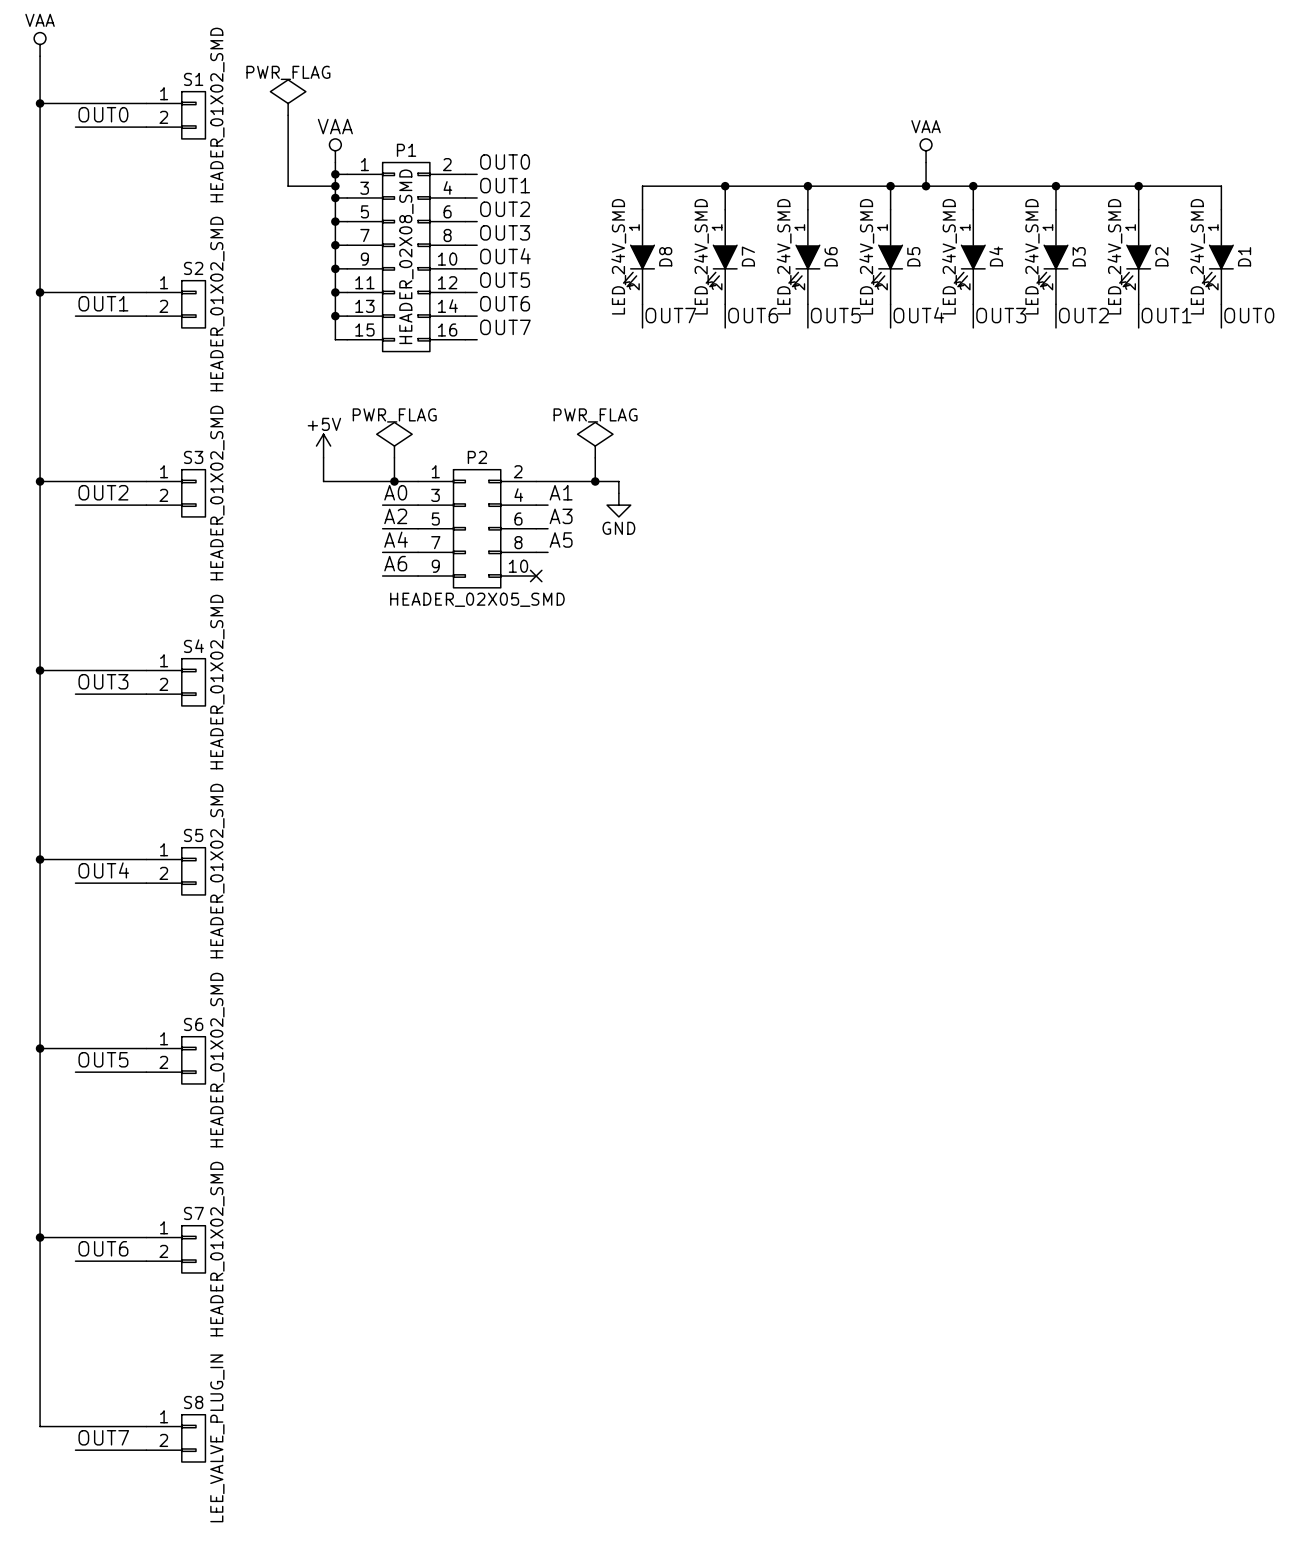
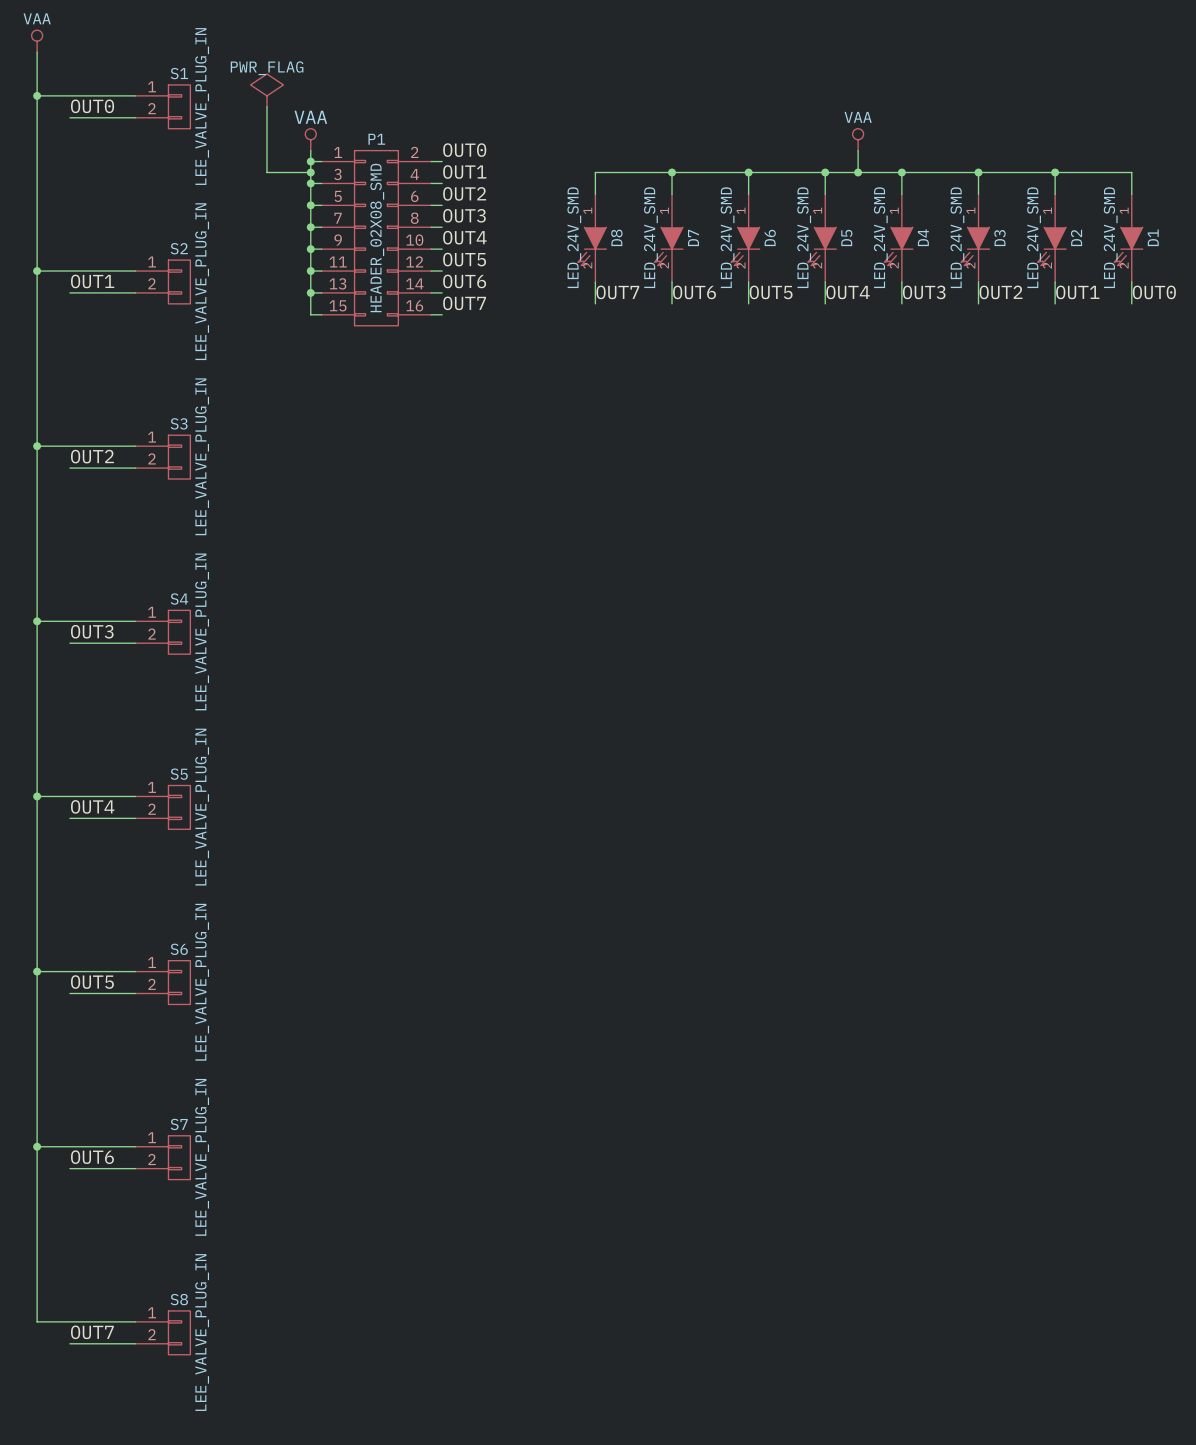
S1 value: HEADER_01X02_SMD (217, 115) -> LEE_VALVE_PLUG_IN (202, 106)
S2 value: HEADER_01X02_SMD (217, 304) -> LEE_VALVE_PLUG_IN (202, 281)
power symbol: PWR_FLAG (394, 440) -> none
power symbol: PWR_FLAG (595, 440) -> none
power symbol: +5V (323, 446) -> none
wire: (323, 457) (323, 481) (418, 481) -> none
wire: (394, 457) (394, 481) -> none
wire: (595, 457) (595, 481) -> none
junction: (394, 481) -> none
wire: (536, 481) (618, 481) (618, 493) -> none
junction: (595, 481) -> none
label: A0 (395, 492) -> none
label: A1 (561, 492) -> none
S3 value: HEADER_01X02_SMD (217, 493) -> LEE_VALVE_PLUG_IN (202, 456)
wire: (382, 505) (418, 505) -> none
wire: (536, 505) (548, 505) -> none
power symbol: GND (618, 505) -> none
label: A2 (395, 516) -> none
label: A3 (561, 516) -> none
wire: (382, 528) (418, 528) -> none
P2: HEADER_02X05_SMD (477, 528) -> none
wire: (536, 528) (548, 528) -> none
label: A4 (396, 539) -> none
label: A5 (561, 540) -> none
wire: (382, 552) (418, 552) -> none
wire: (536, 552) (548, 552) -> none
label: A6 (395, 563) -> none
wire: (382, 576) (418, 576) -> none
no-connect mark: (536, 576) -> none
S4 value: HEADER_01X02_SMD (217, 682) -> LEE_VALVE_PLUG_IN (202, 631)
S5 value: HEADER_01X02_SMD (217, 871) -> LEE_VALVE_PLUG_IN (202, 807)
S6 value: HEADER_01X02_SMD (217, 1060) -> LEE_VALVE_PLUG_IN (202, 982)
S7 value: HEADER_01X02_SMD (217, 1249) -> LEE_VALVE_PLUG_IN (202, 1157)

